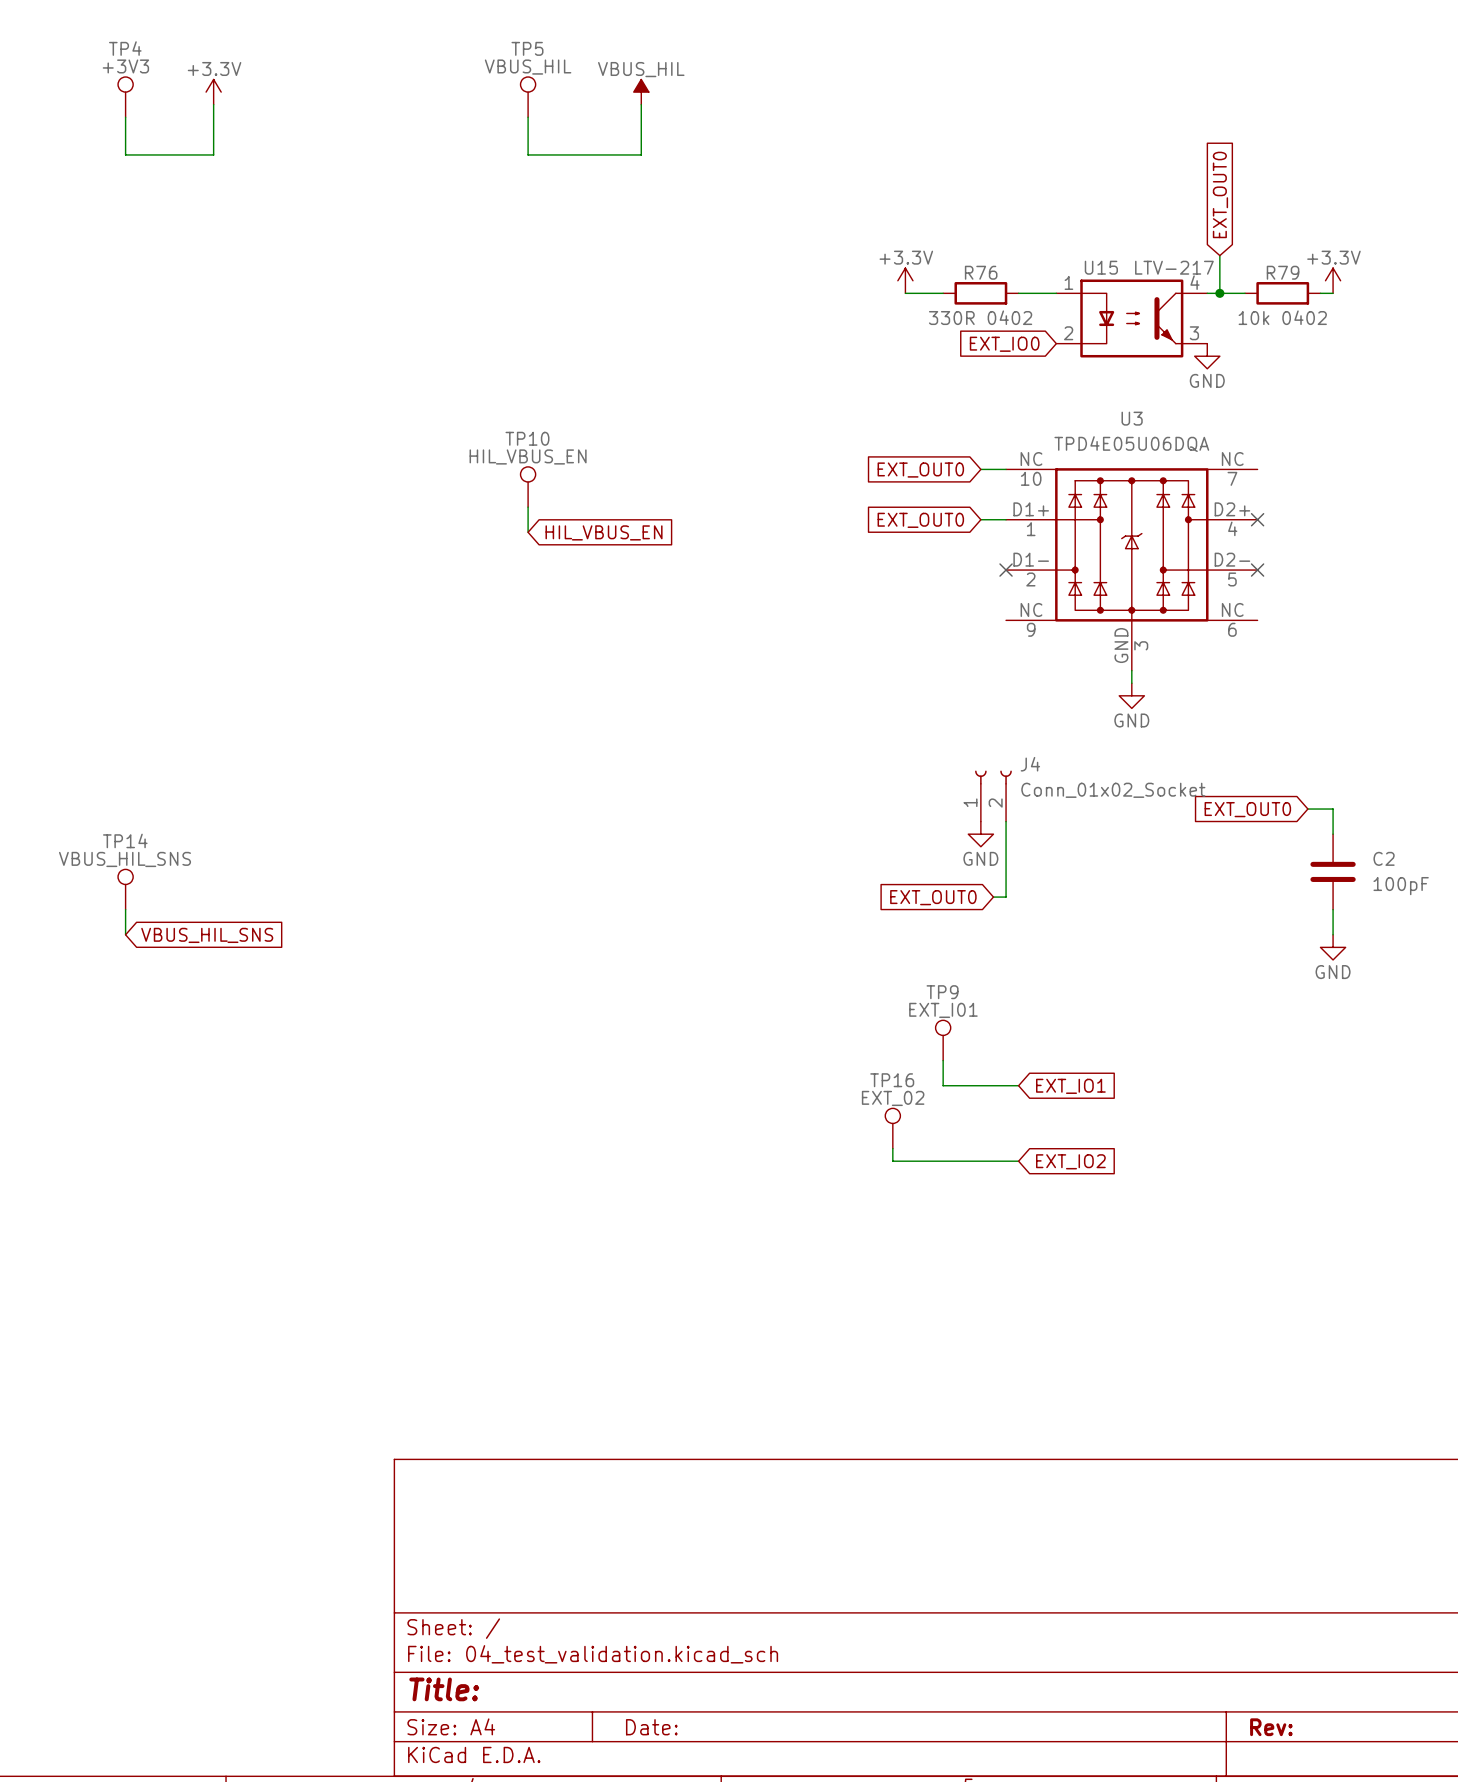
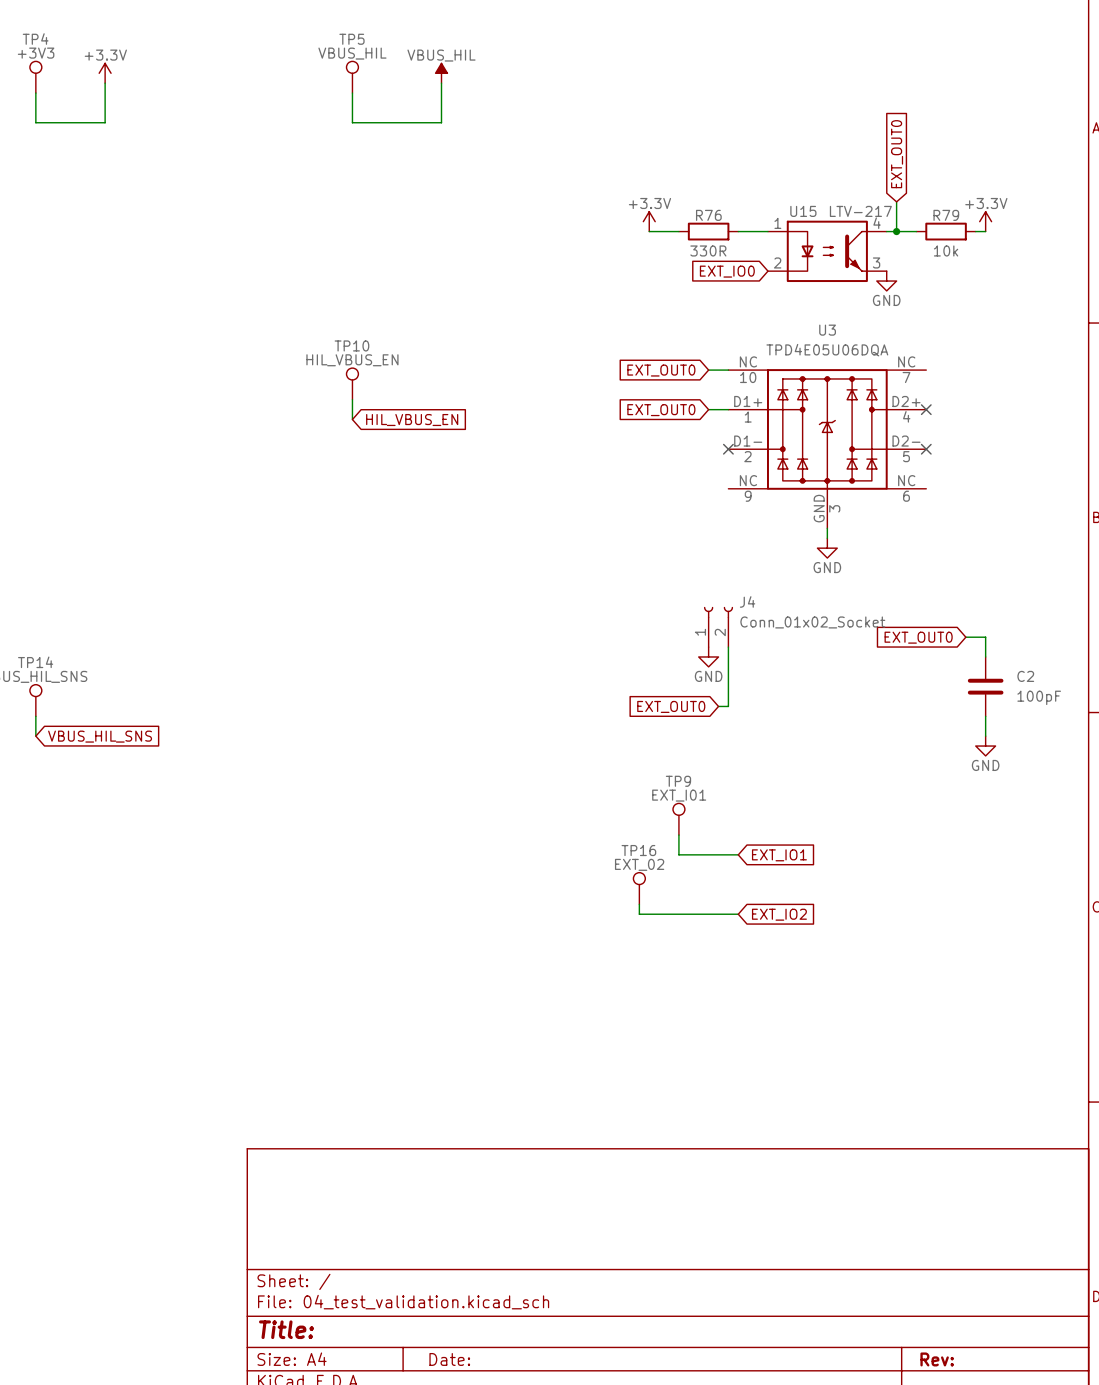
R76 value: 330R 0402 (980, 317) -> 330R (708, 250)
R79 value: 10k 0402 (1282, 317) -> 10k (946, 250)

